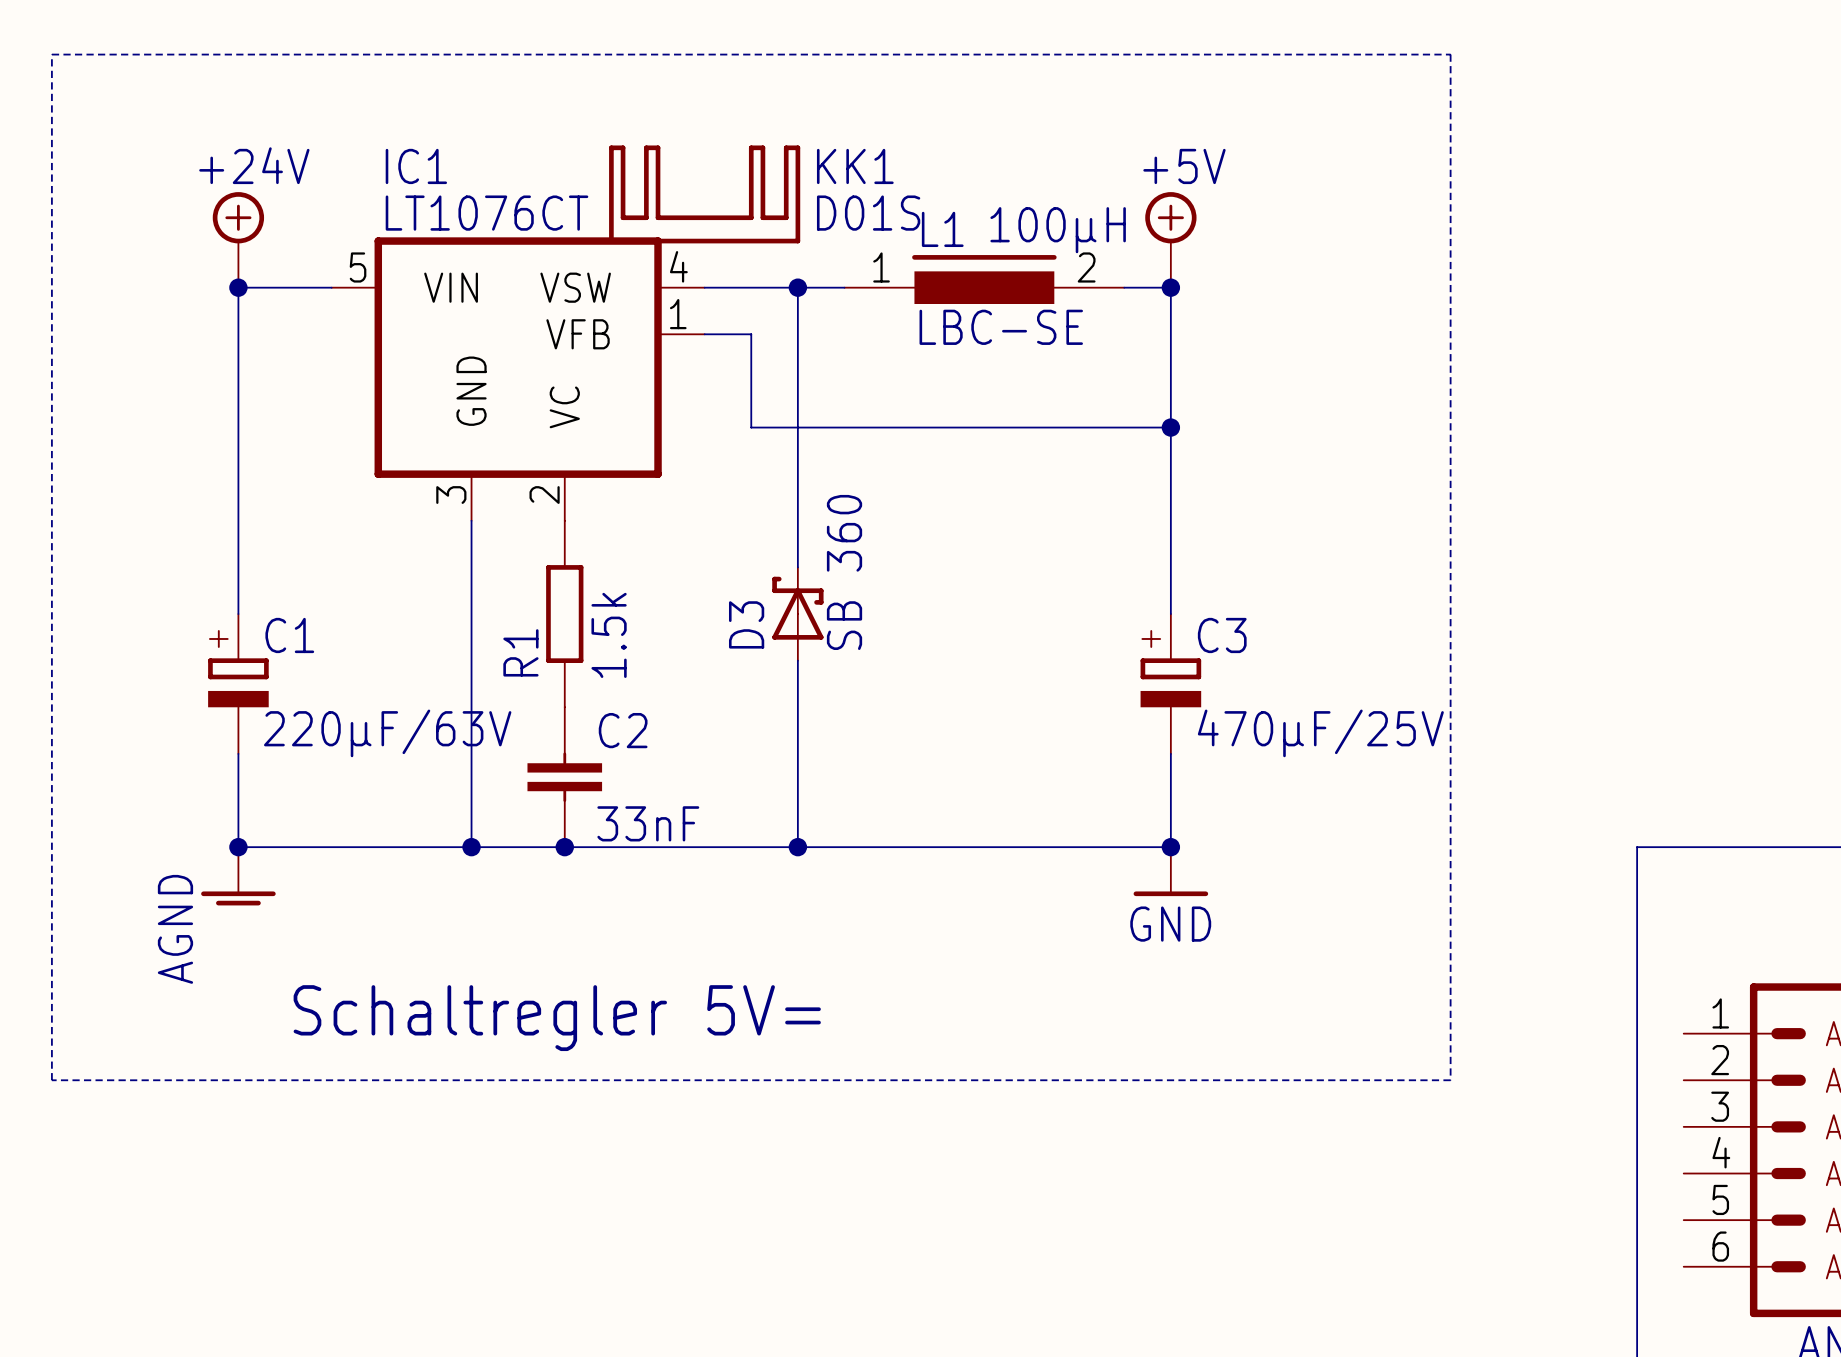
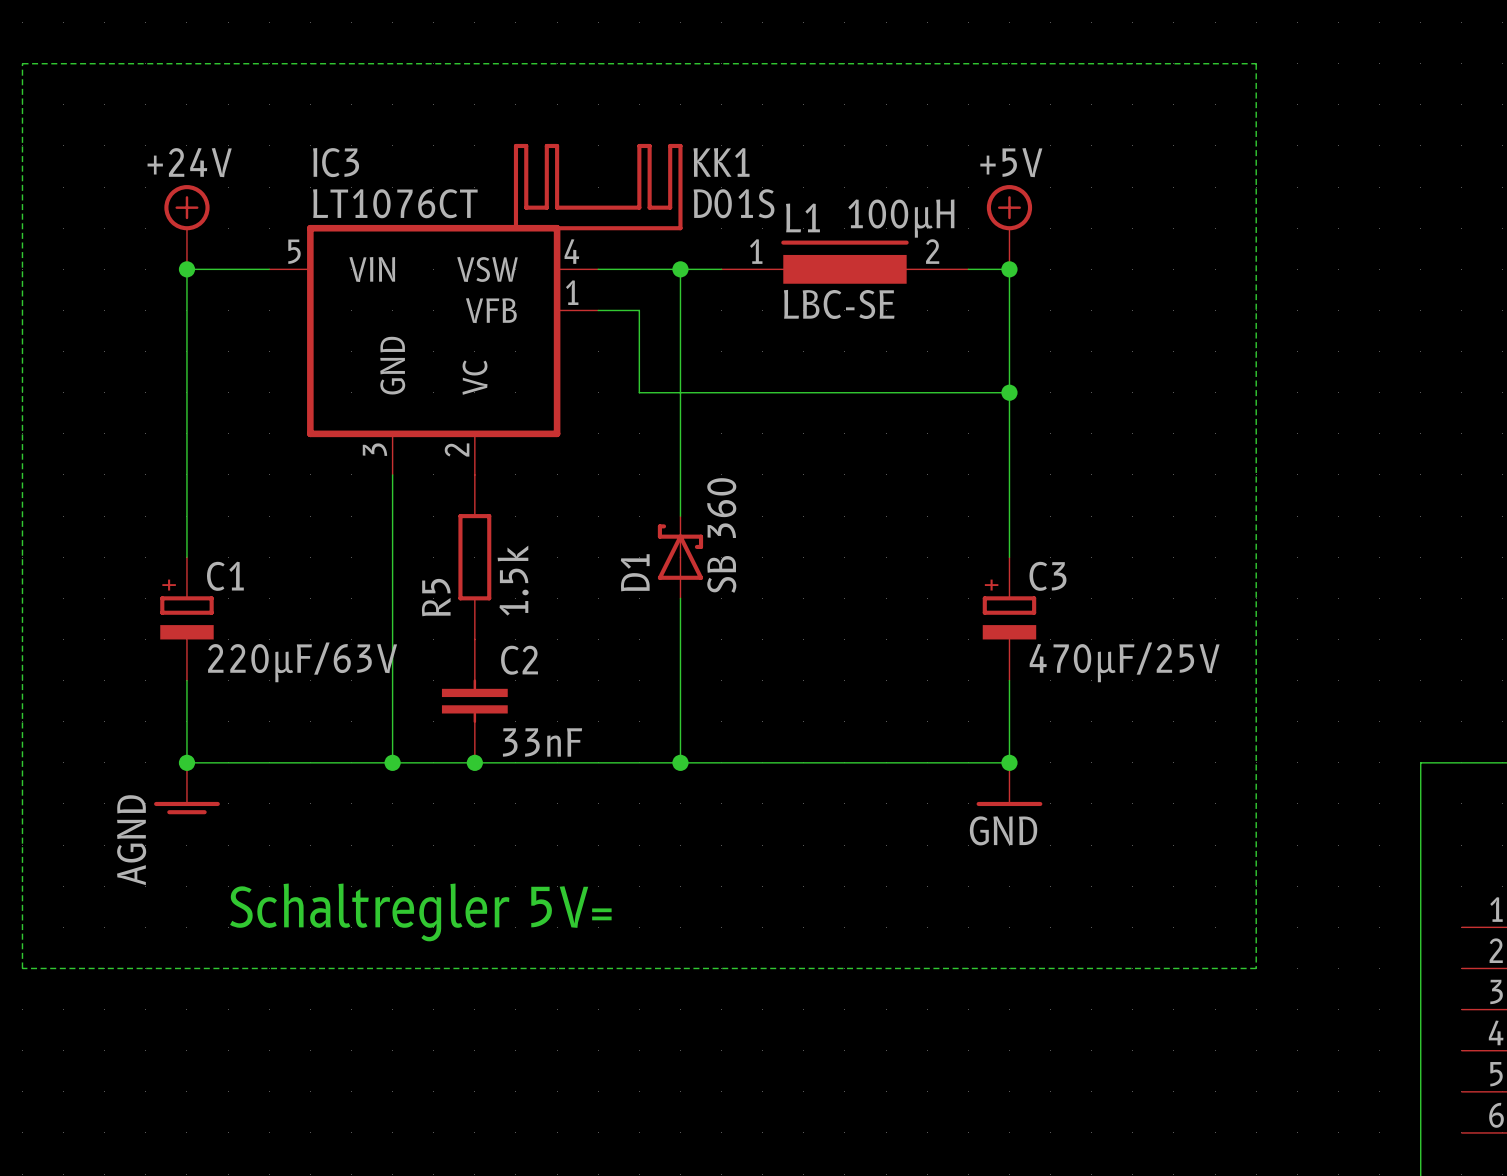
IC1 name: IC1 (416, 166) -> IC3 (336, 162)
D3 name: D3 (746, 624) -> D1 (635, 572)
R1 name: R1 (520, 652) -> R5 (436, 597)

